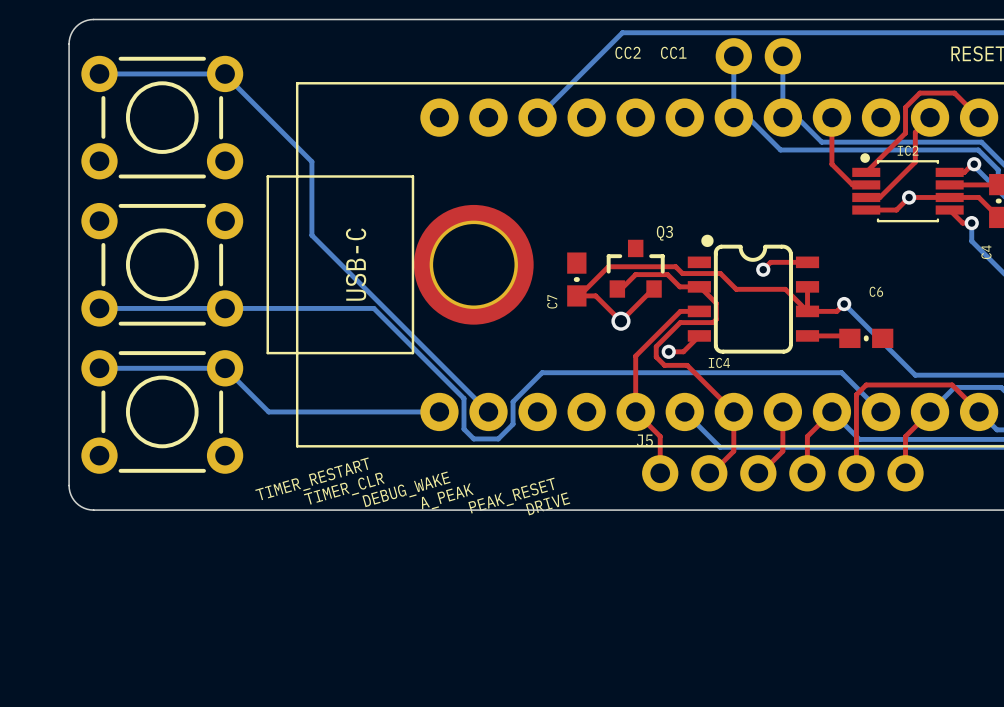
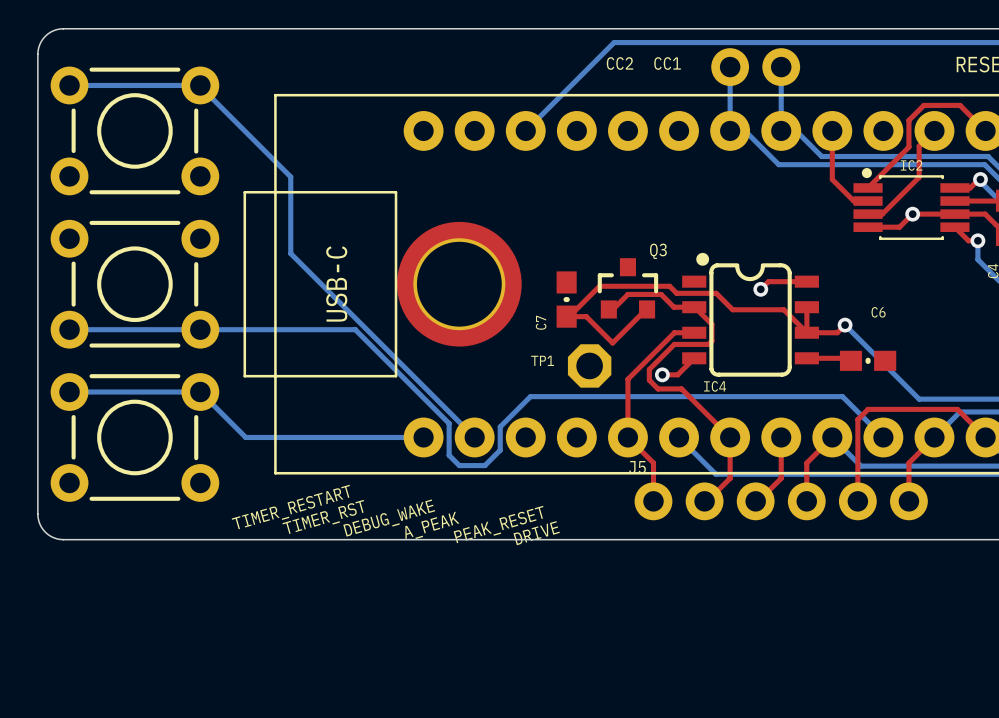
via: (620, 321) -> none
TP1: none -> (589, 365)
text: TIMER_CLR (344, 488) -> TIMER_RST (323, 516)

